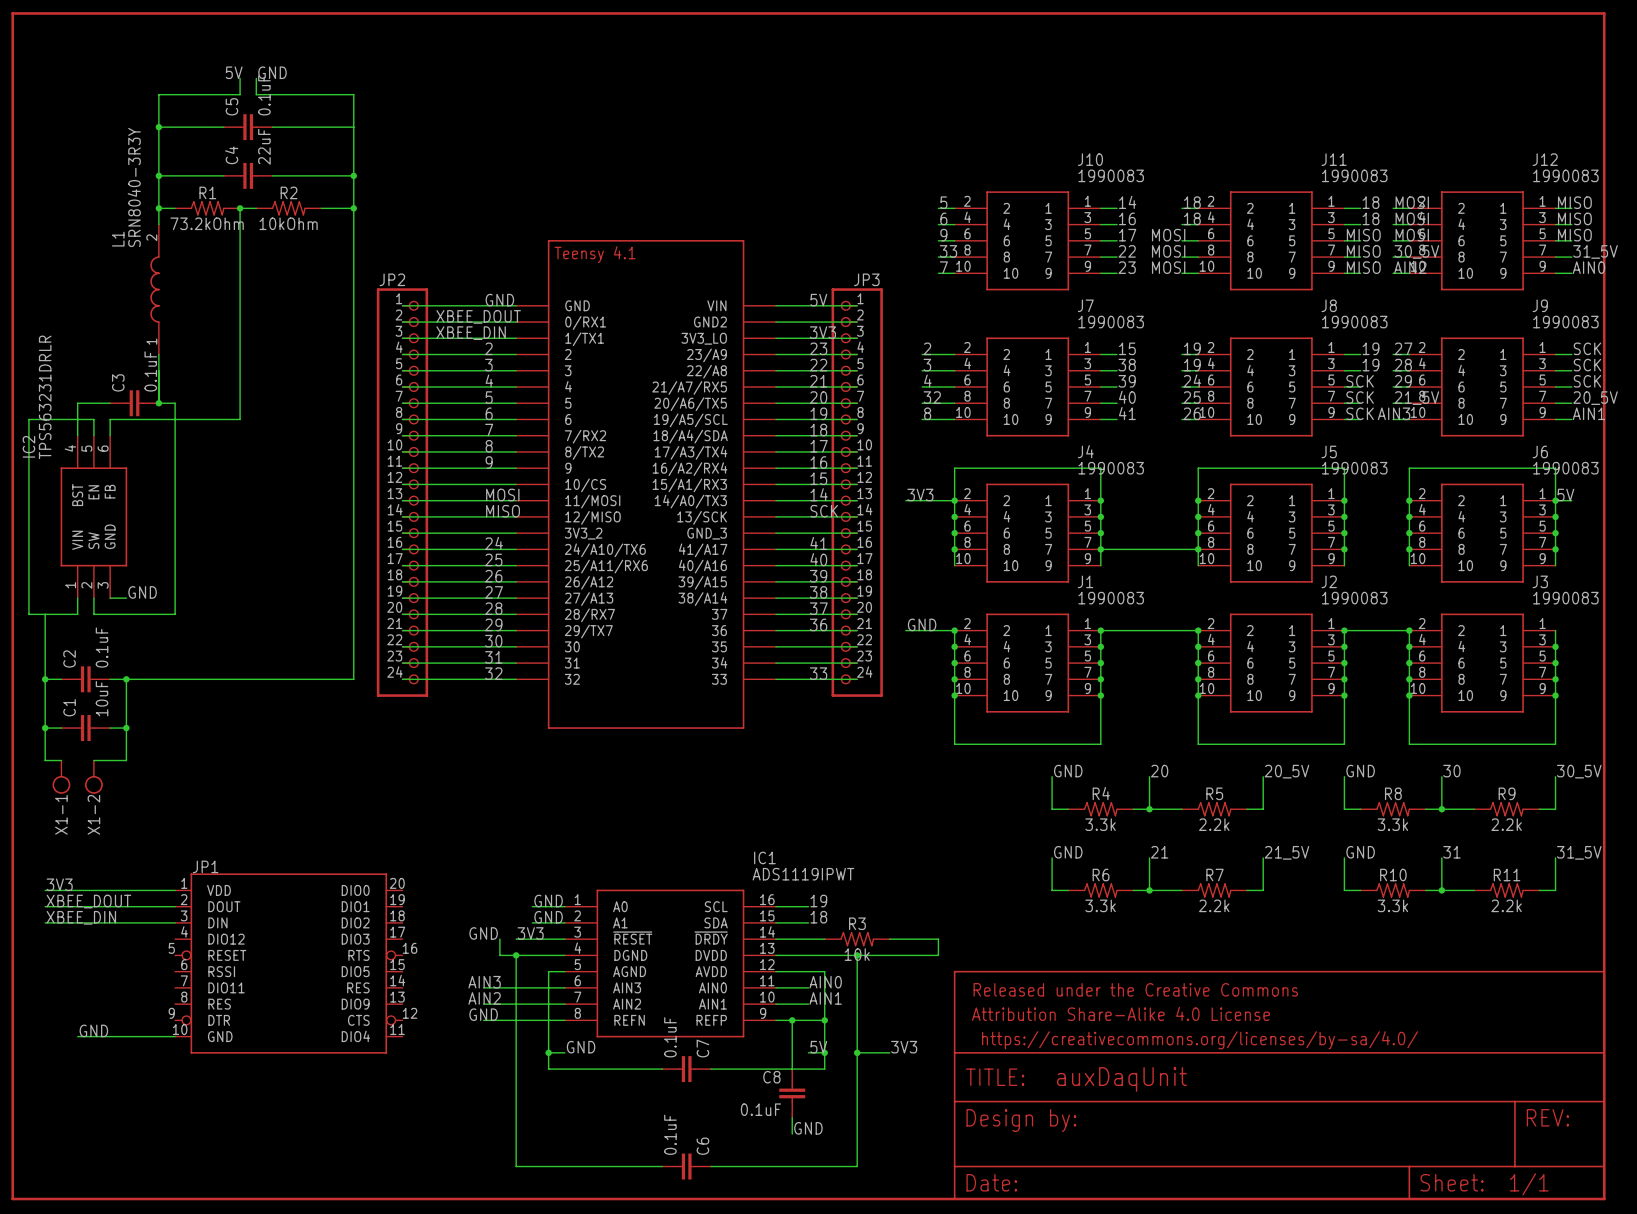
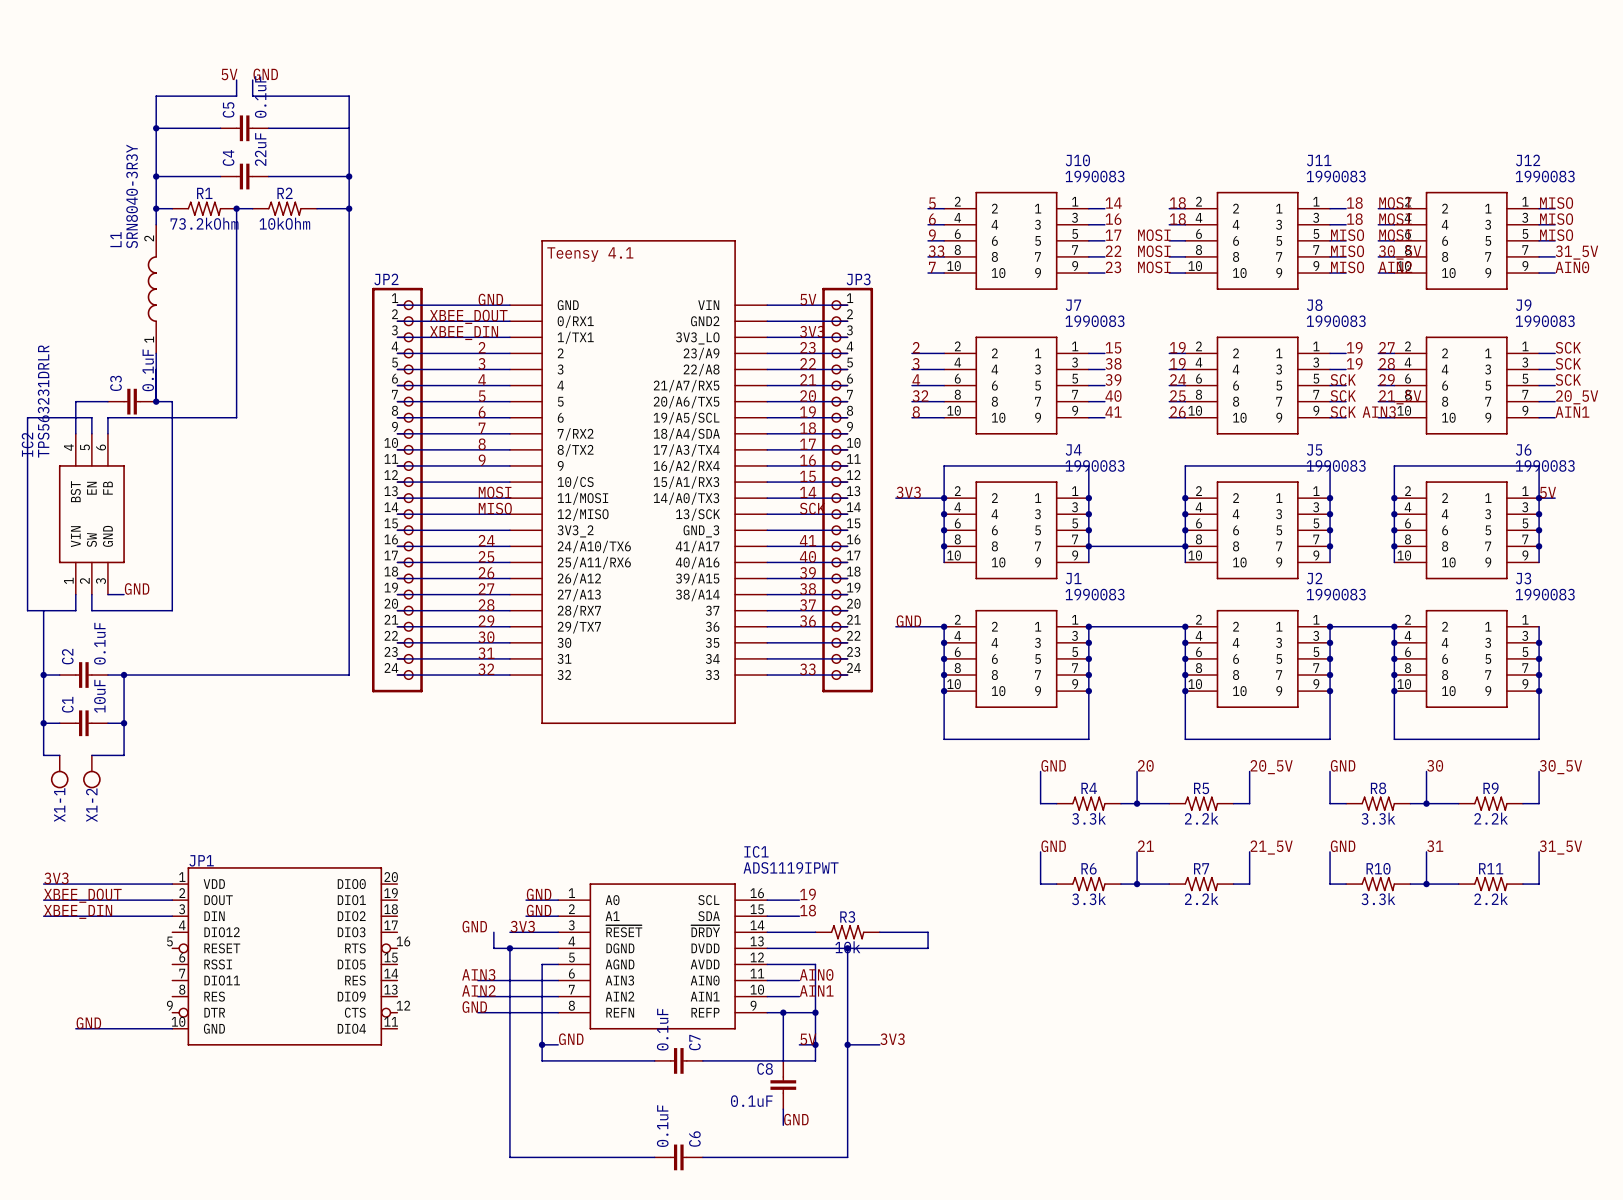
part: (808, 606) -> none
part: (1279, 1085) -> none

